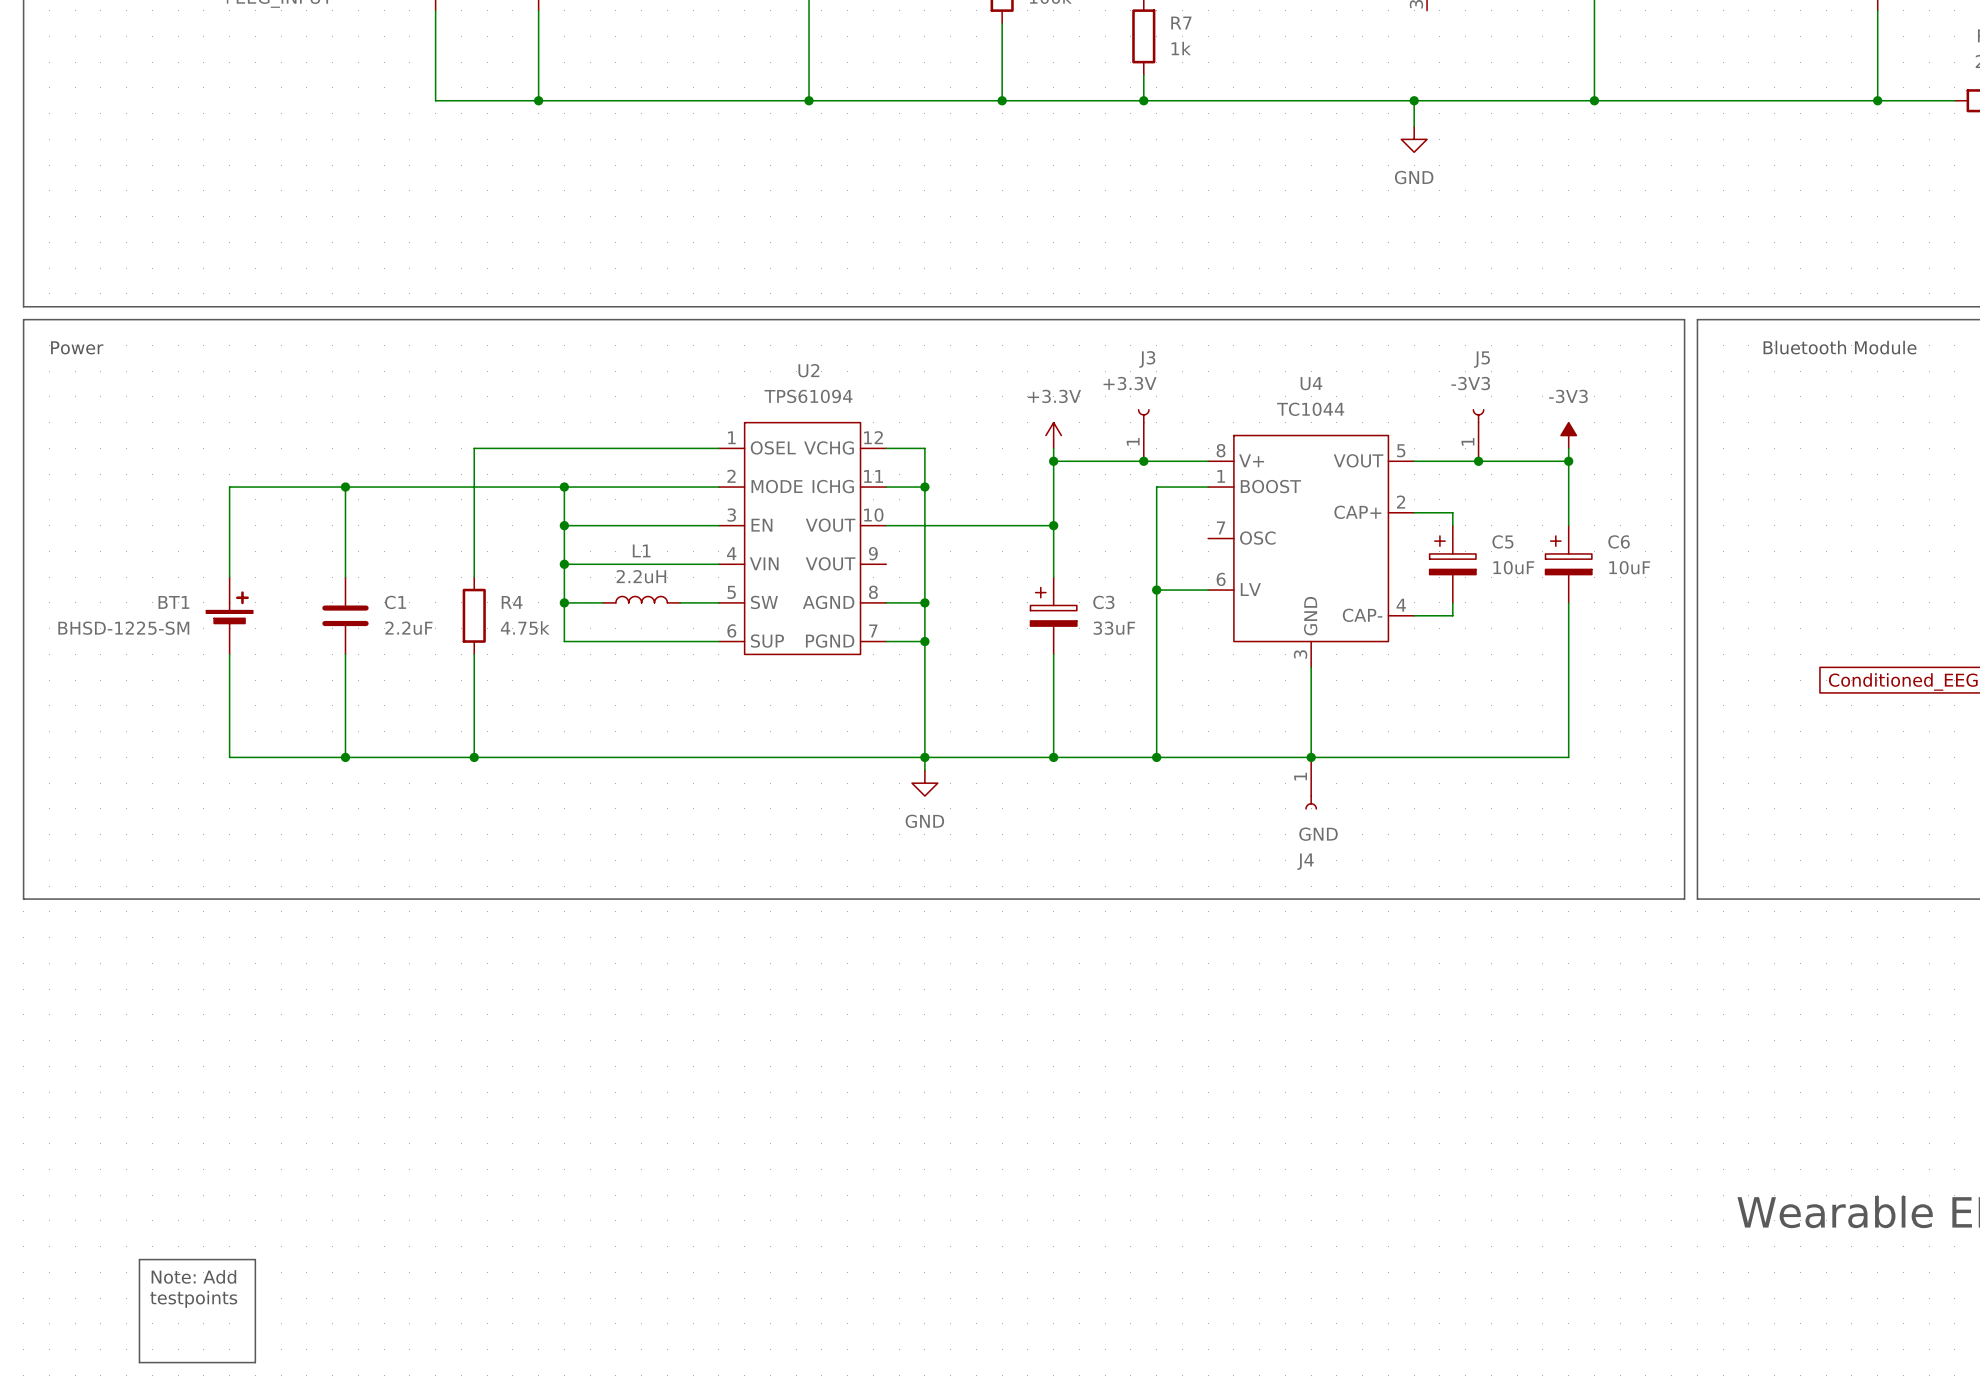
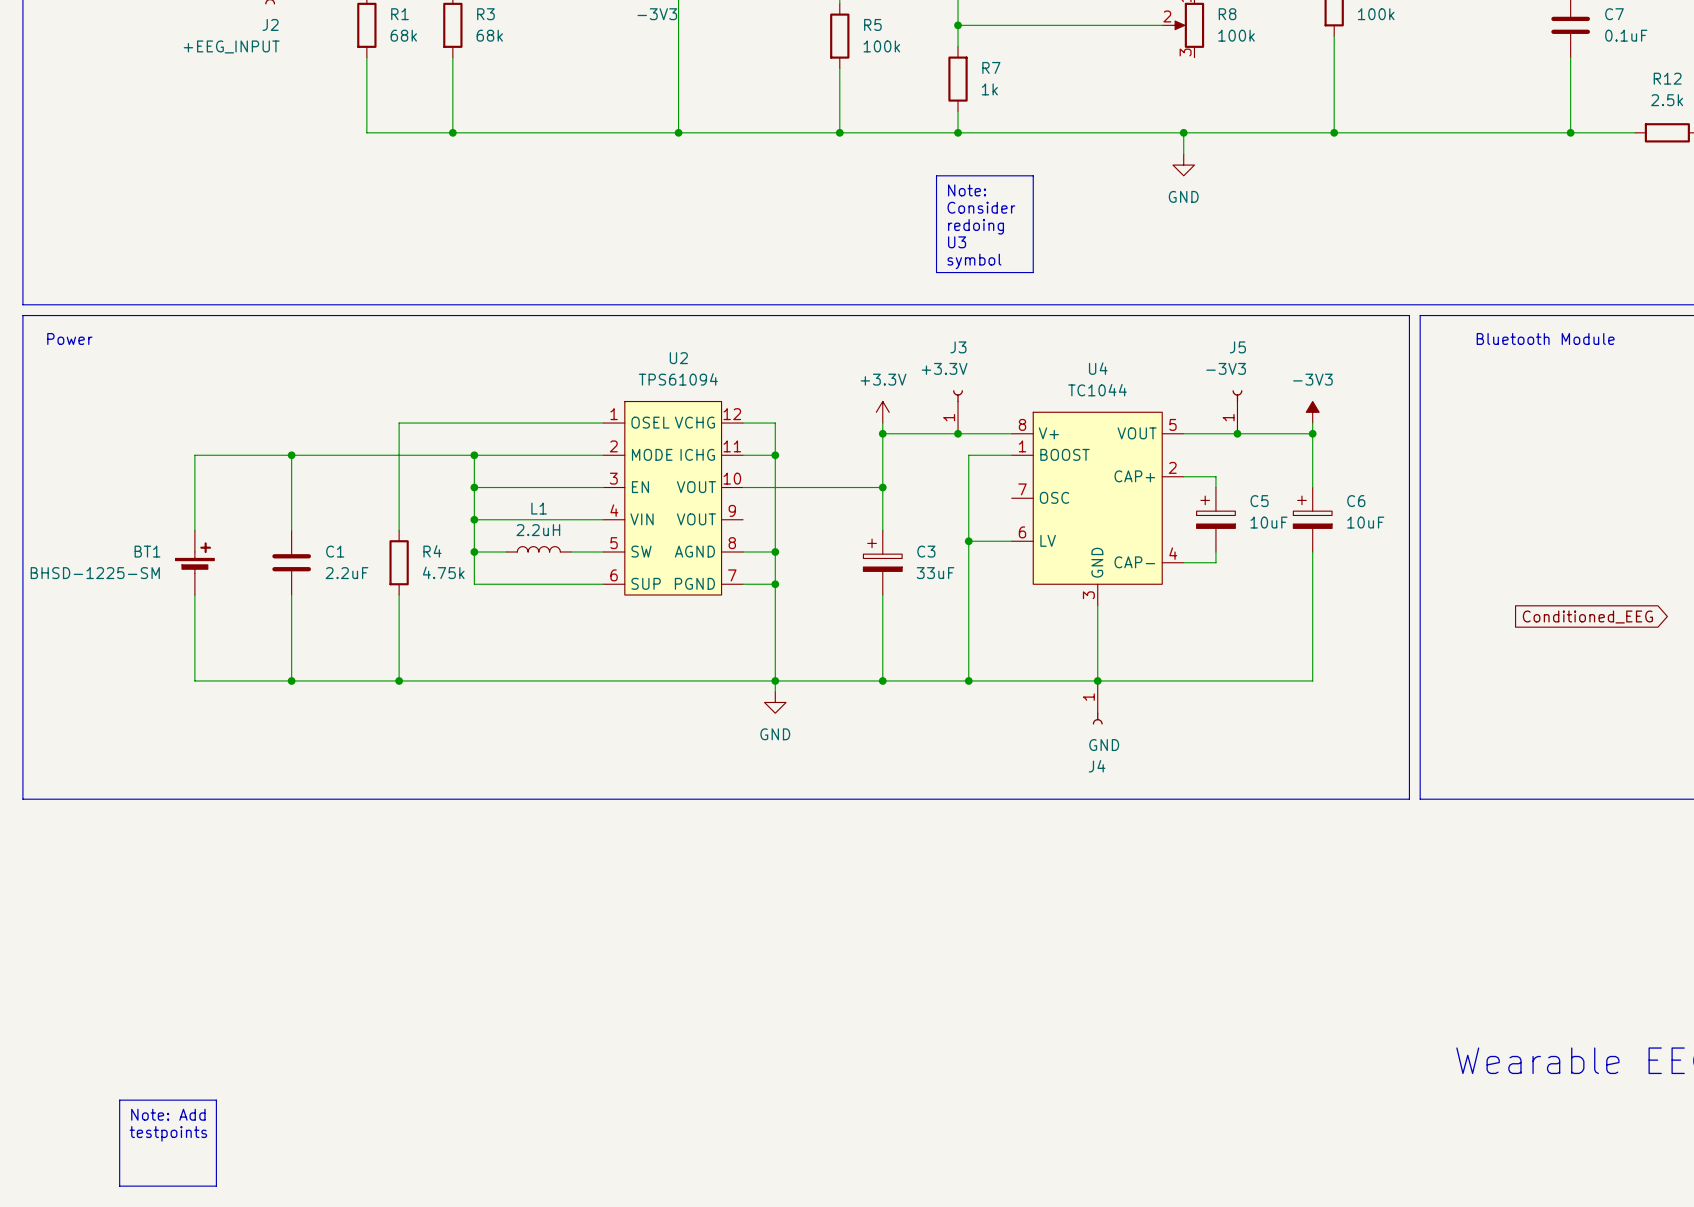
line: none -> (936, 175) (1033, 175) (1033, 272) (936, 272) (936, 175)
text: none -> Note: (967, 190)
text: none -> Consider (981, 207)
text: none -> redoing (976, 226)
text: none -> U3 (957, 242)
text: none -> symbol (974, 261)

